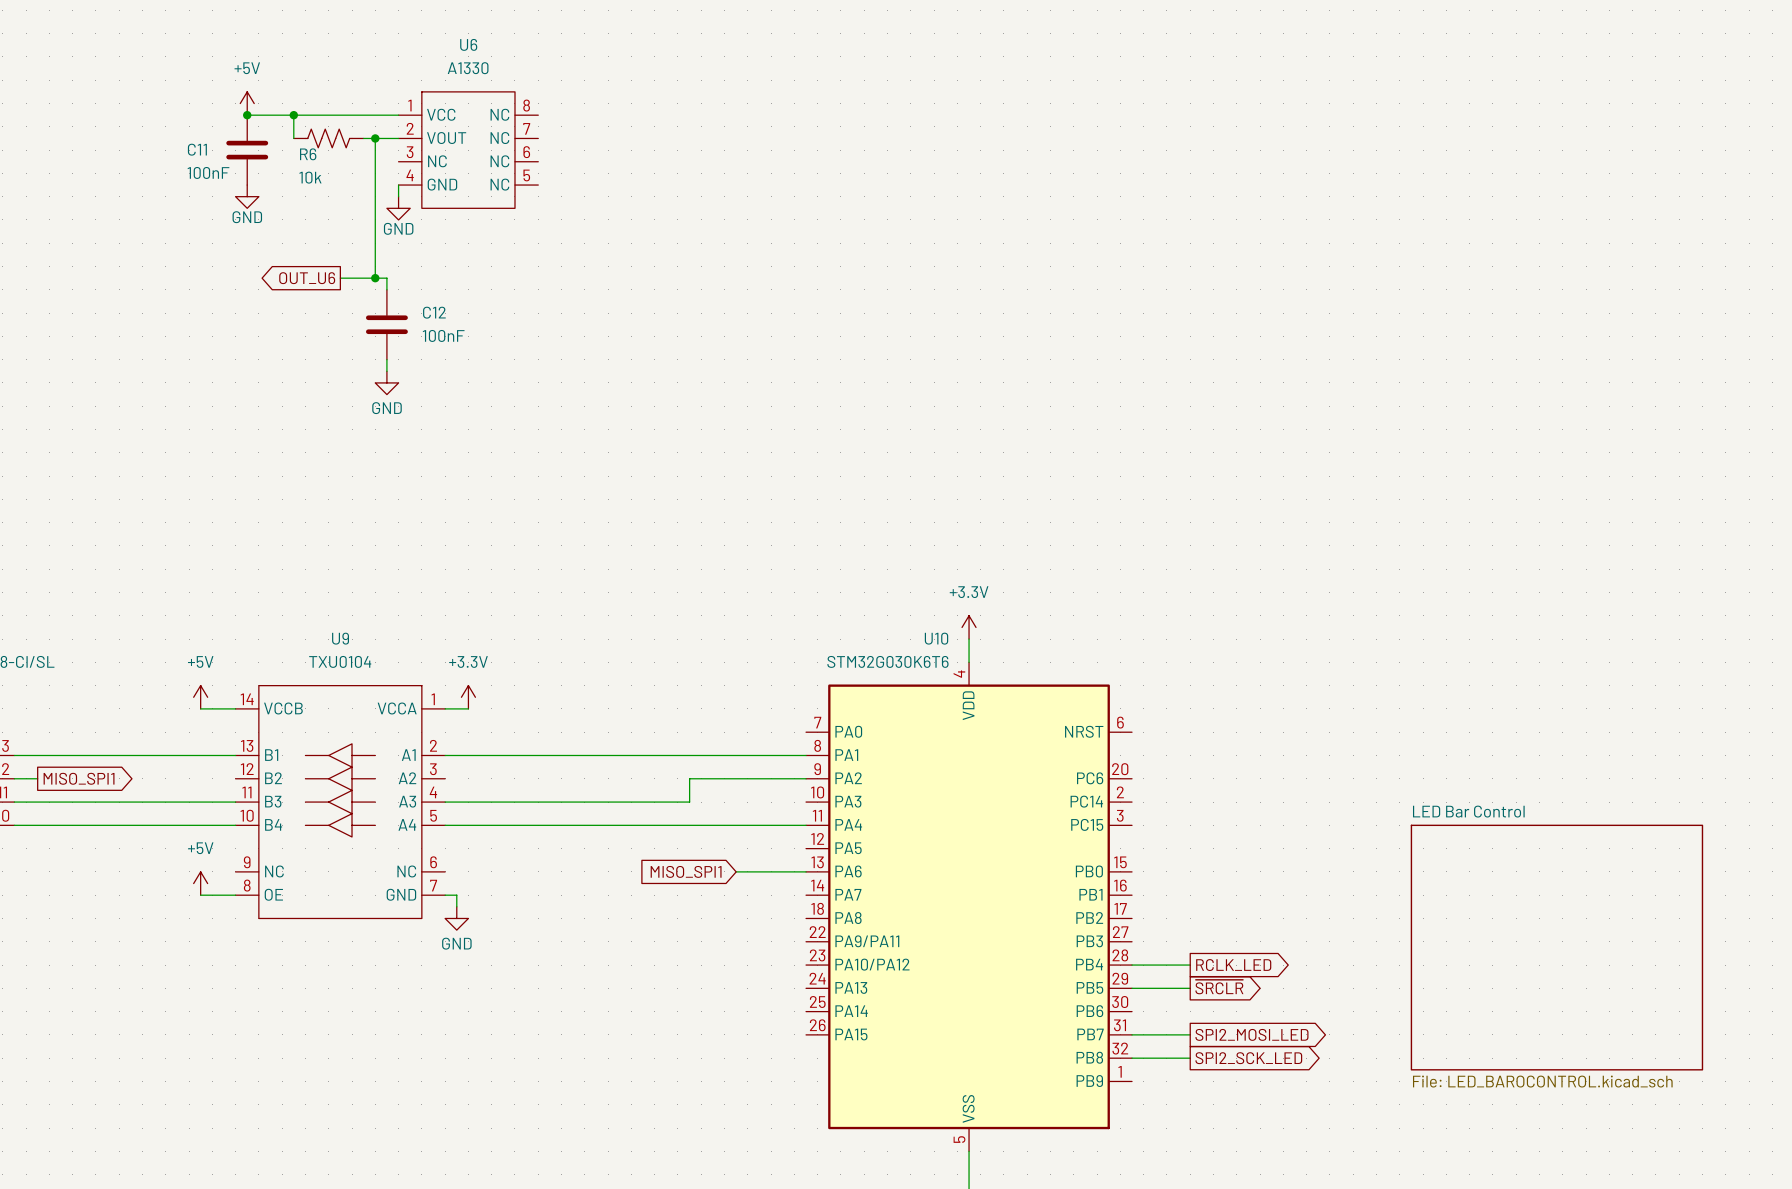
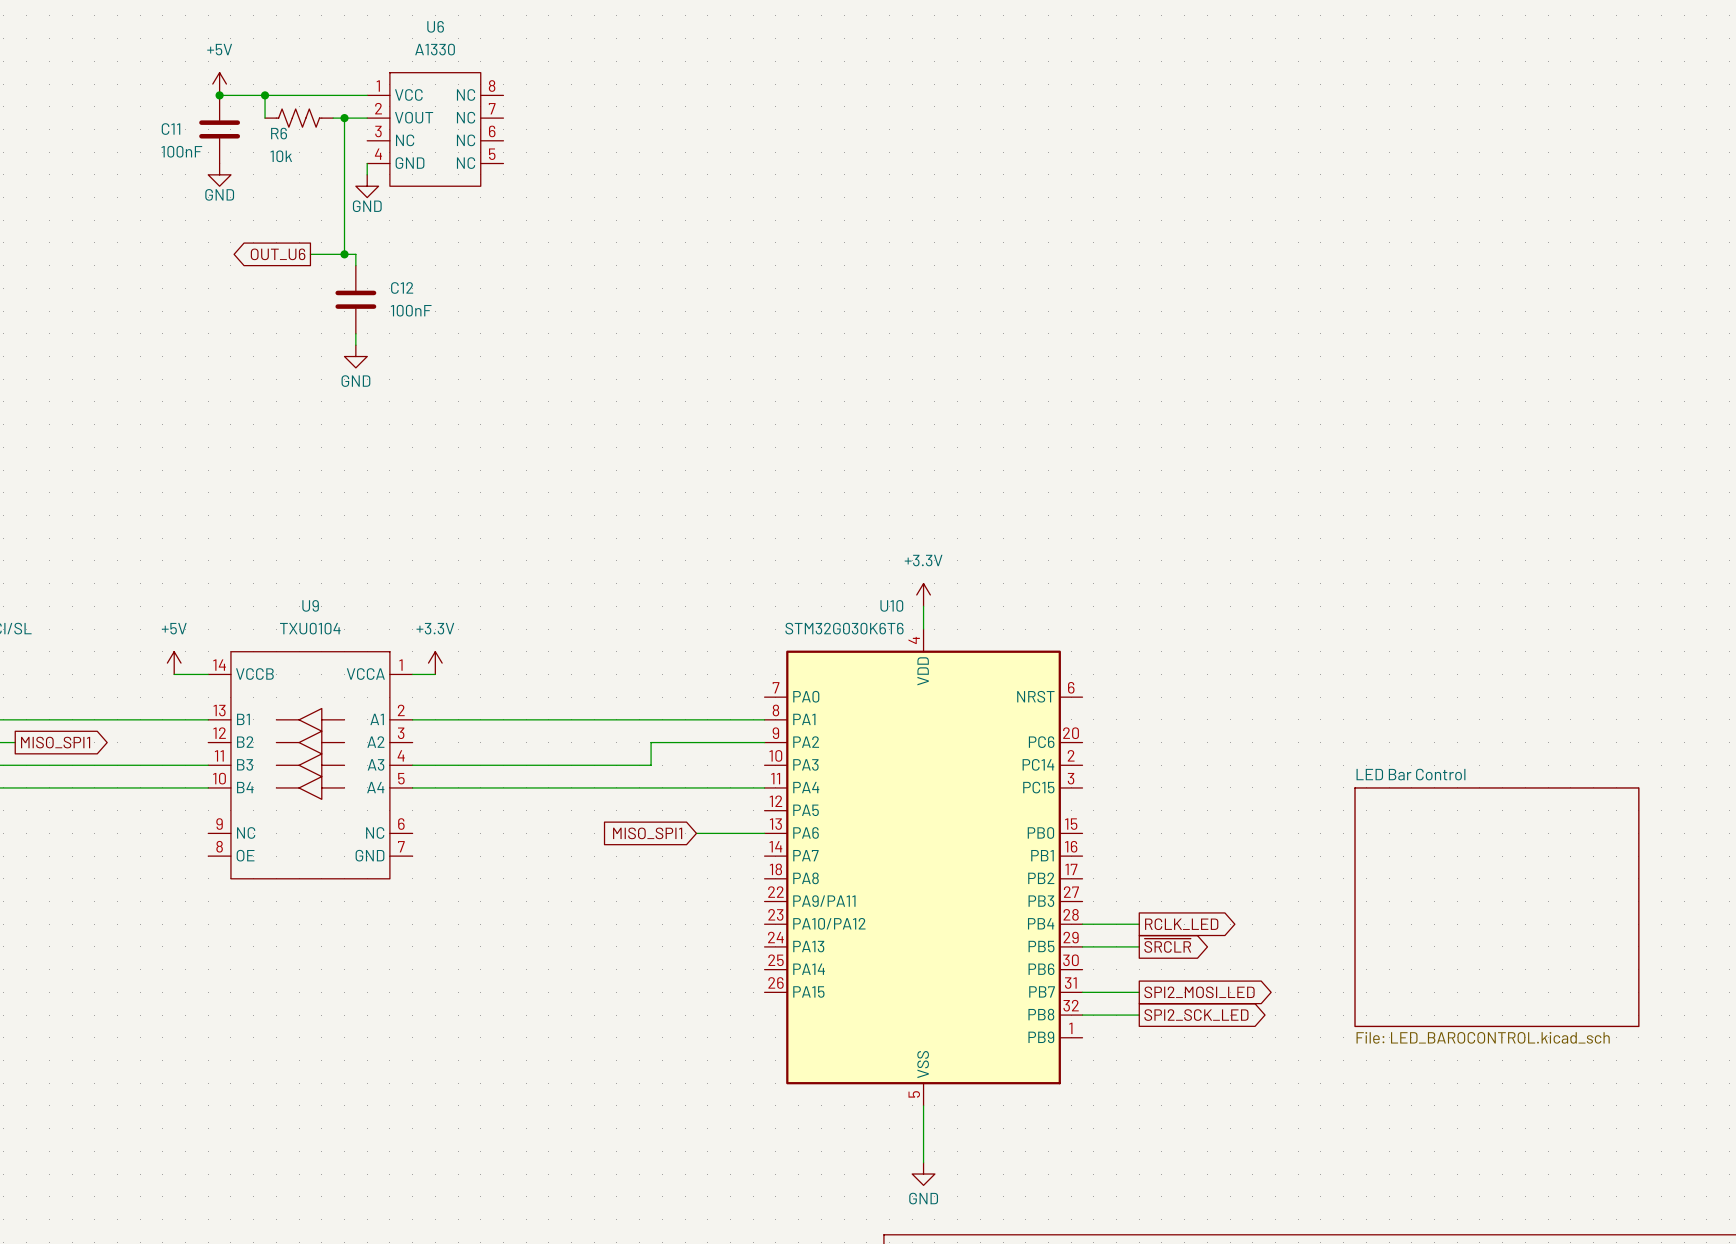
power symbol: +5V (200, 883) -> none
wire: (200, 895) (235, 895) -> none
wire: (445, 895) (456, 895) (456, 906) -> none
power symbol: GND (456, 918) -> none

